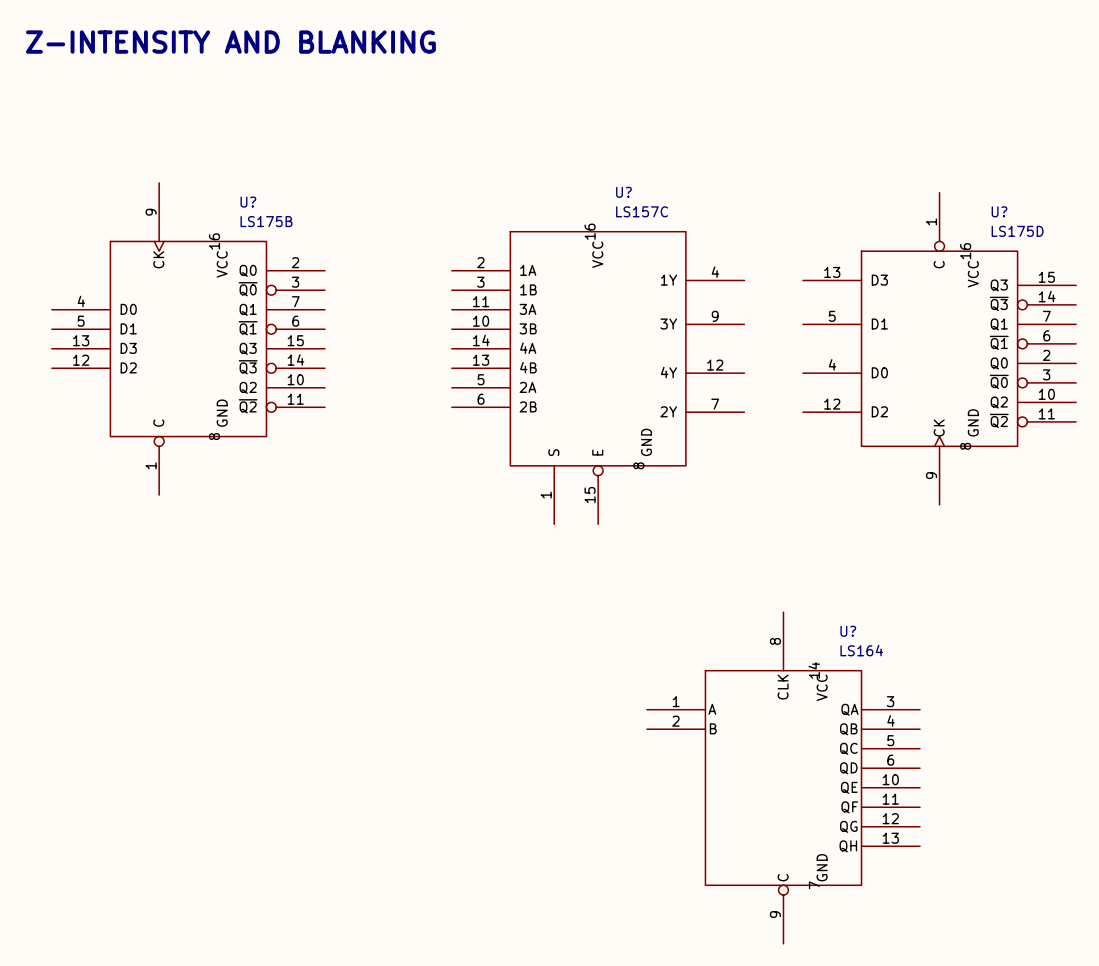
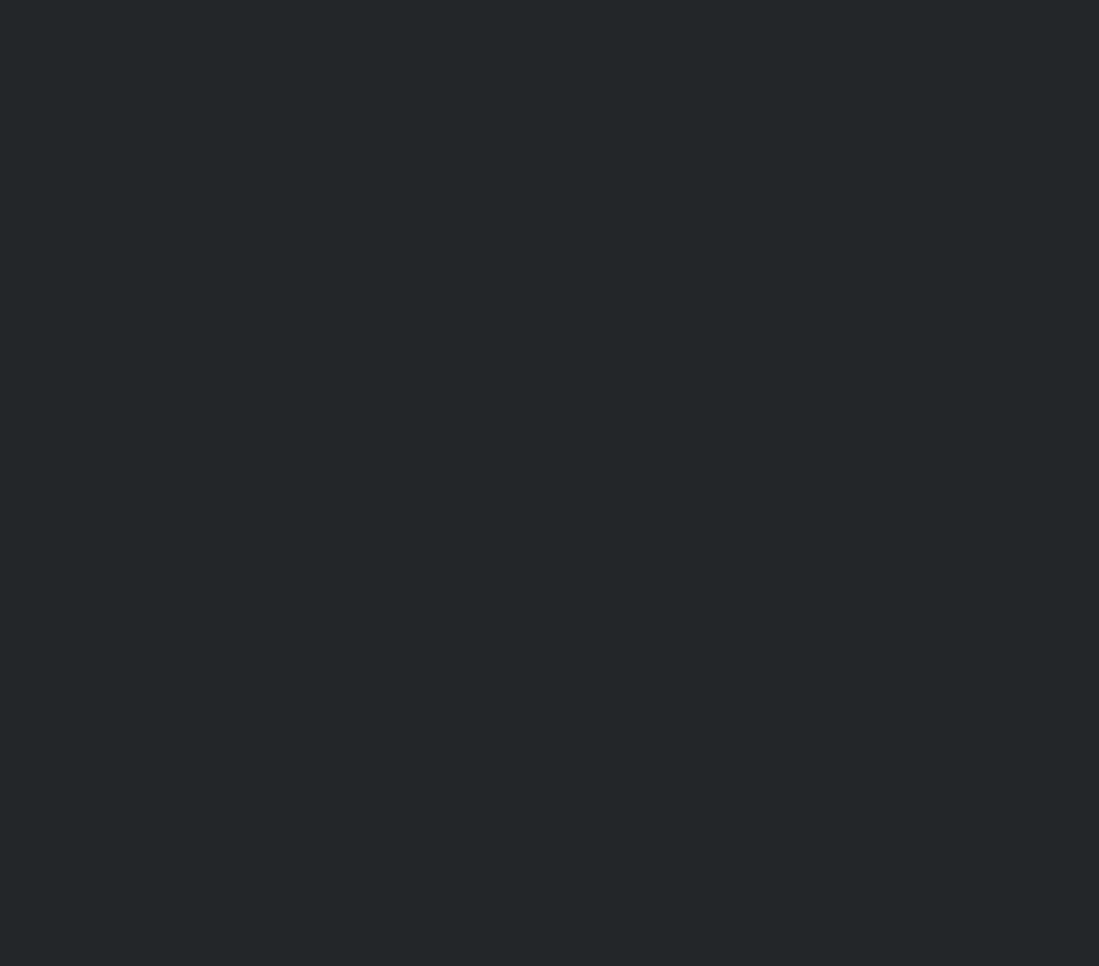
text: Z-INTENSITY AND BLANKING (230, 42) -> none
U?: LS175B (188, 339) -> none
U?: LS175D (939, 348) -> none
U?: LS157C (598, 378) -> none
U?: LS164 (783, 777) -> none

